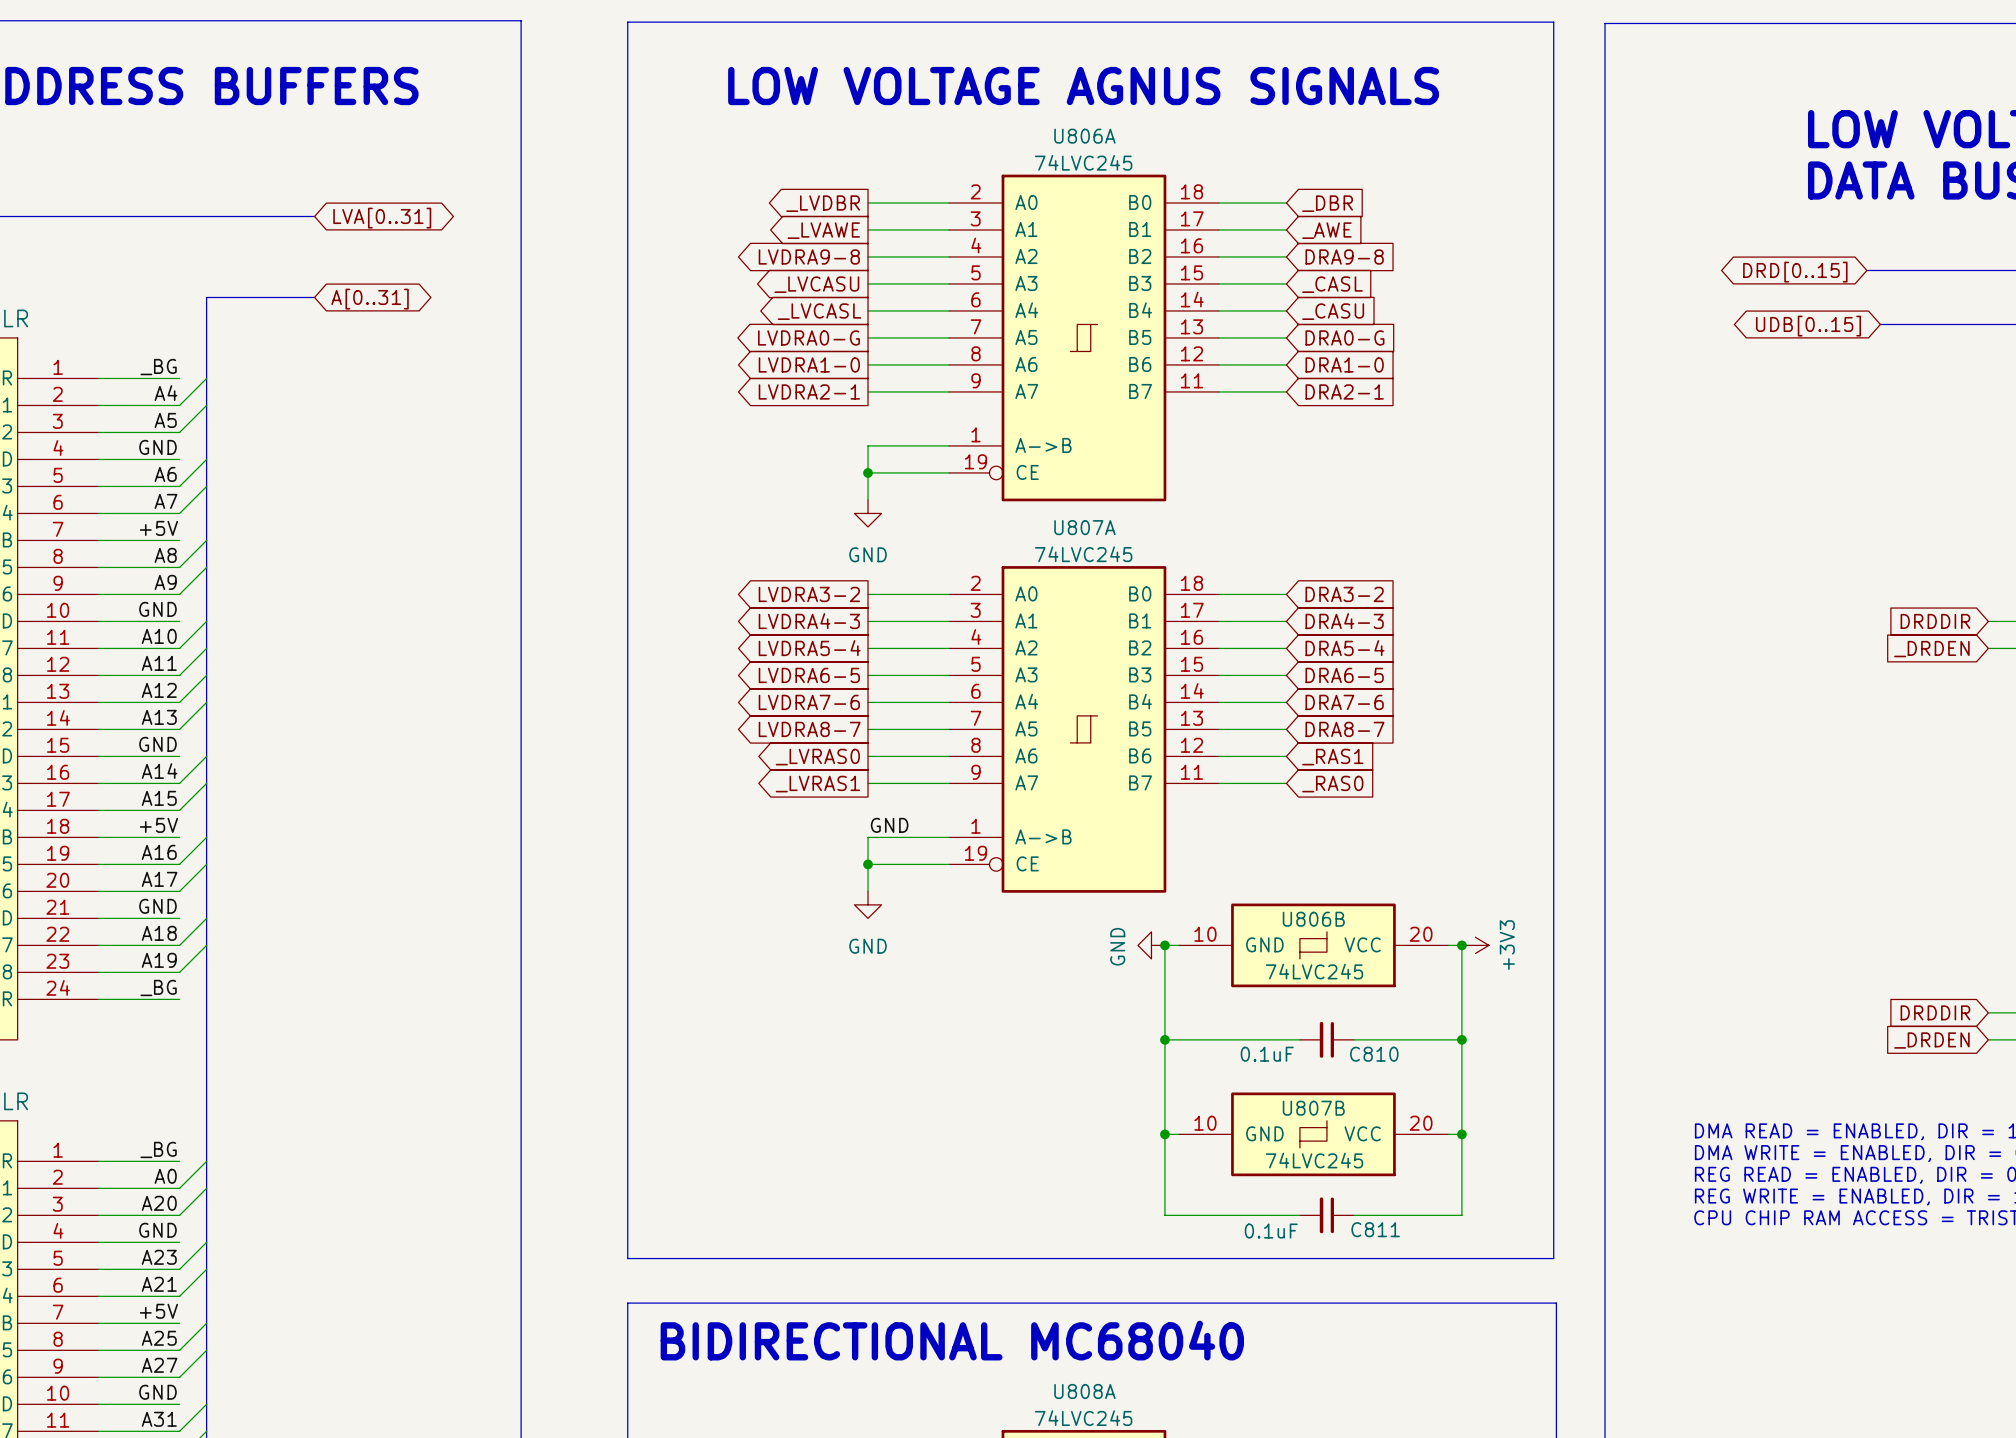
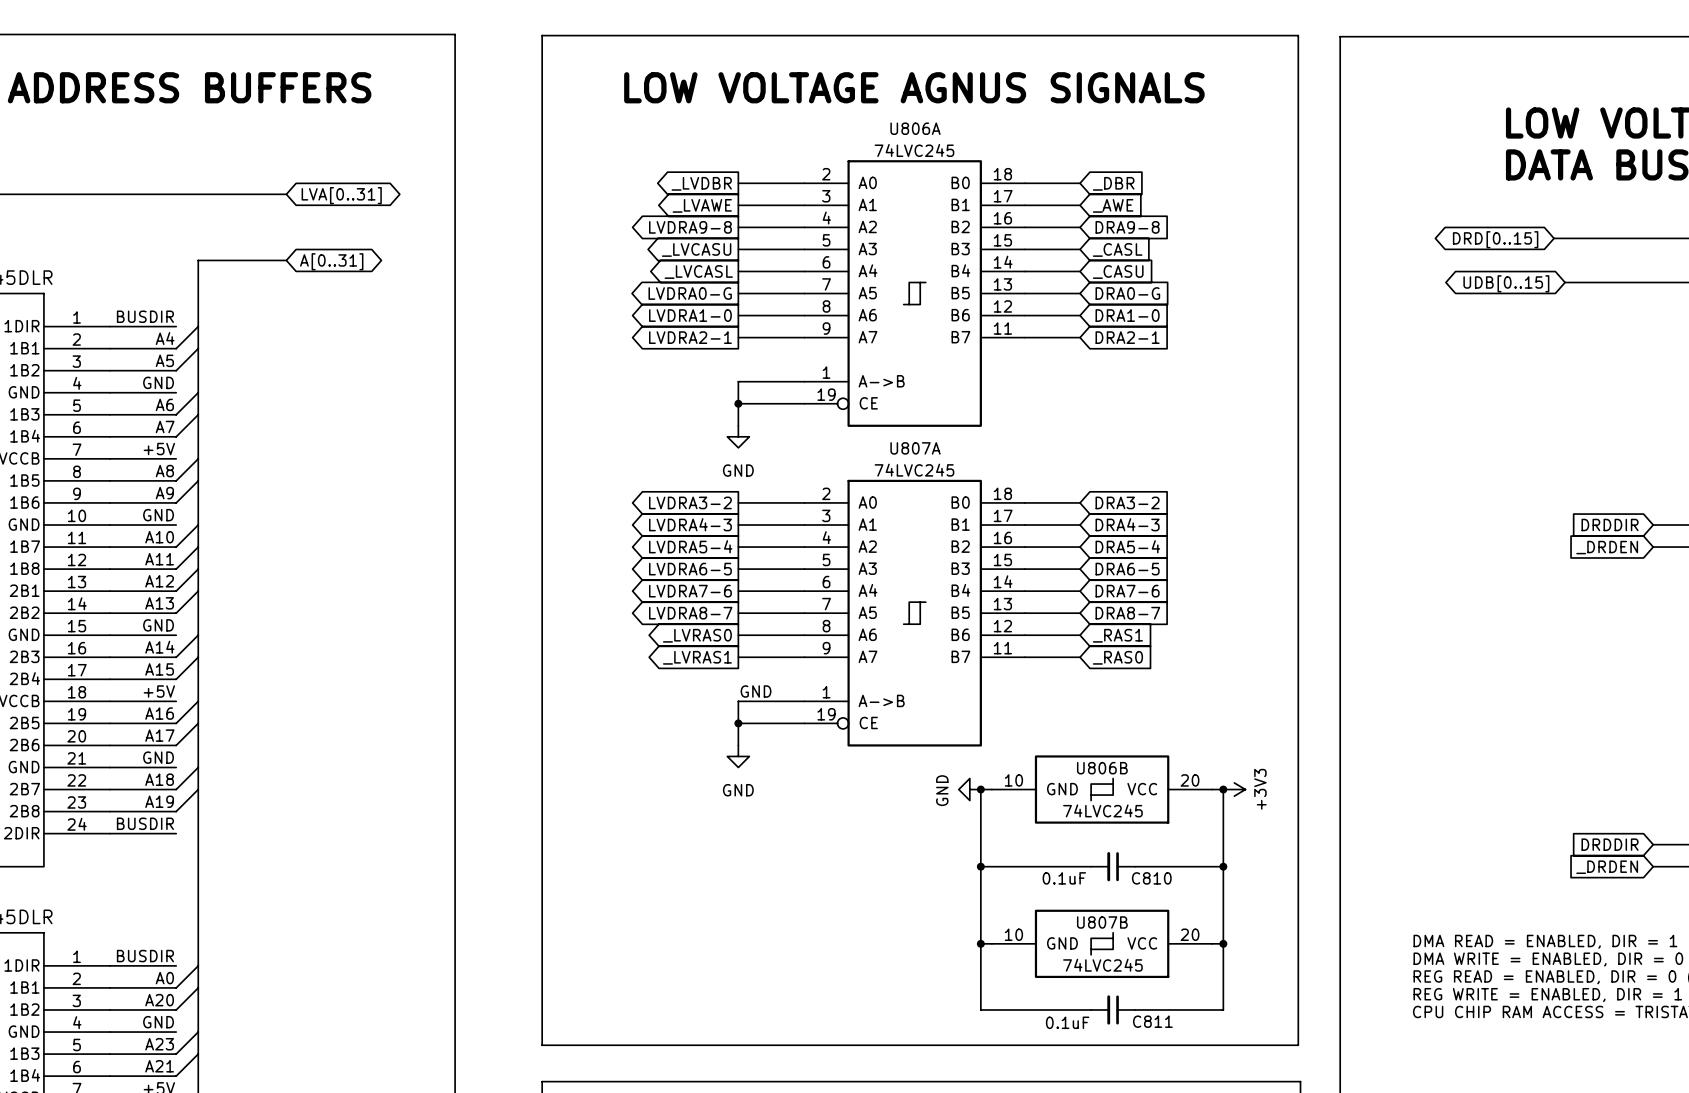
label: _BG (158, 367) -> BUSDIR (145, 316)
label: _BG (158, 987) -> BUSDIR (145, 823)
label: _BG (158, 1149) -> BUSDIR (145, 956)

